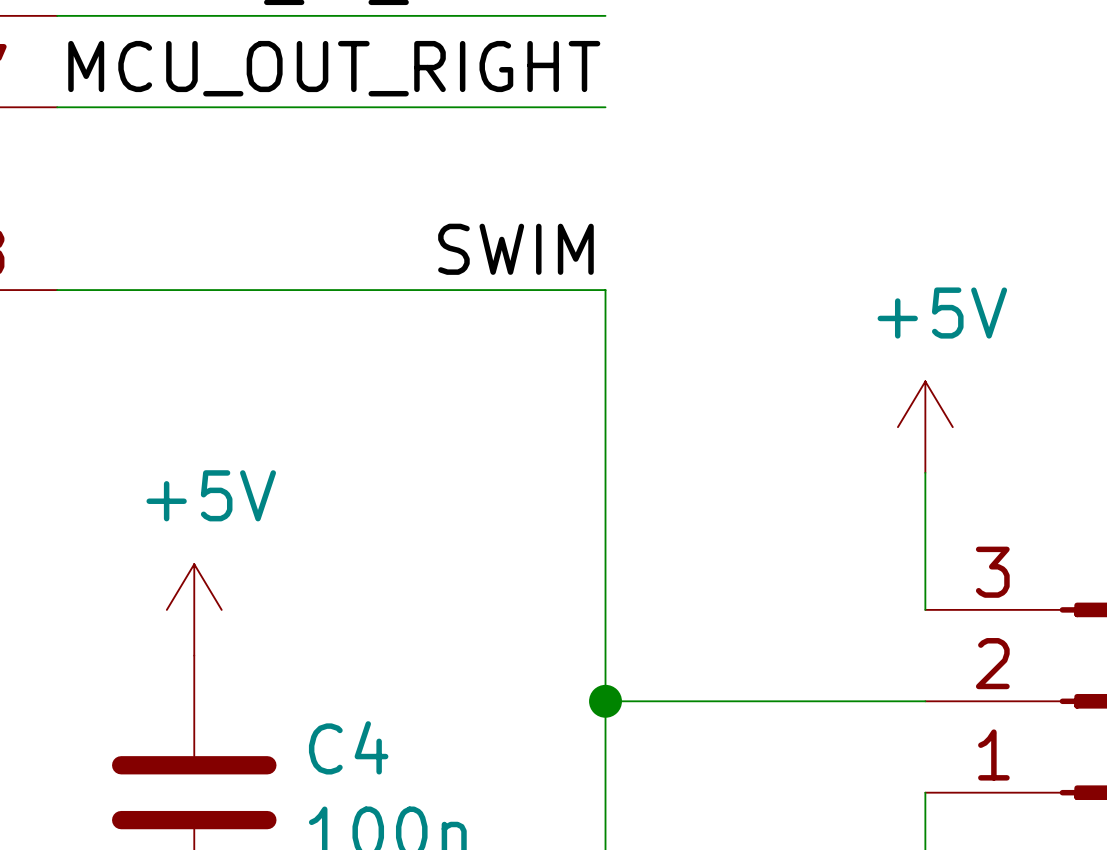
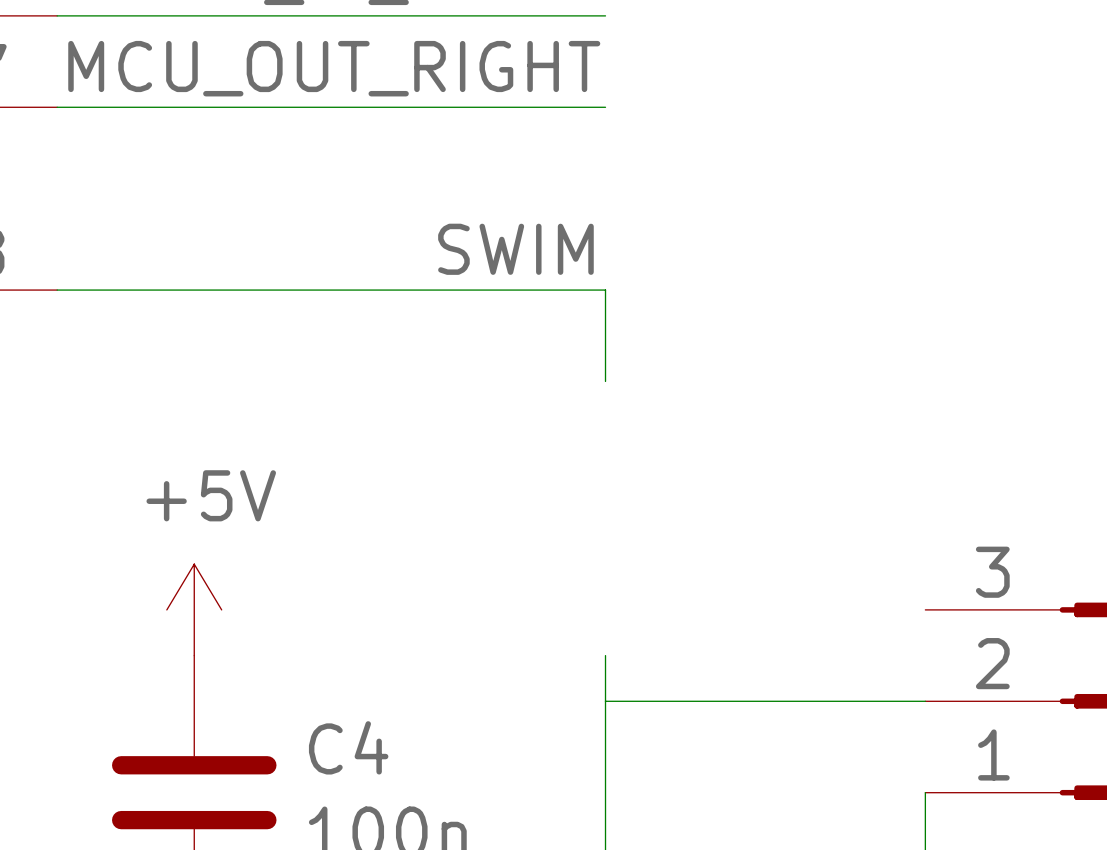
wire: (605, 381) (605, 655) -> none
power symbol: +5V (925, 427) -> none
wire: (925, 472) (925, 609) -> none
junction: (605, 701) -> none

